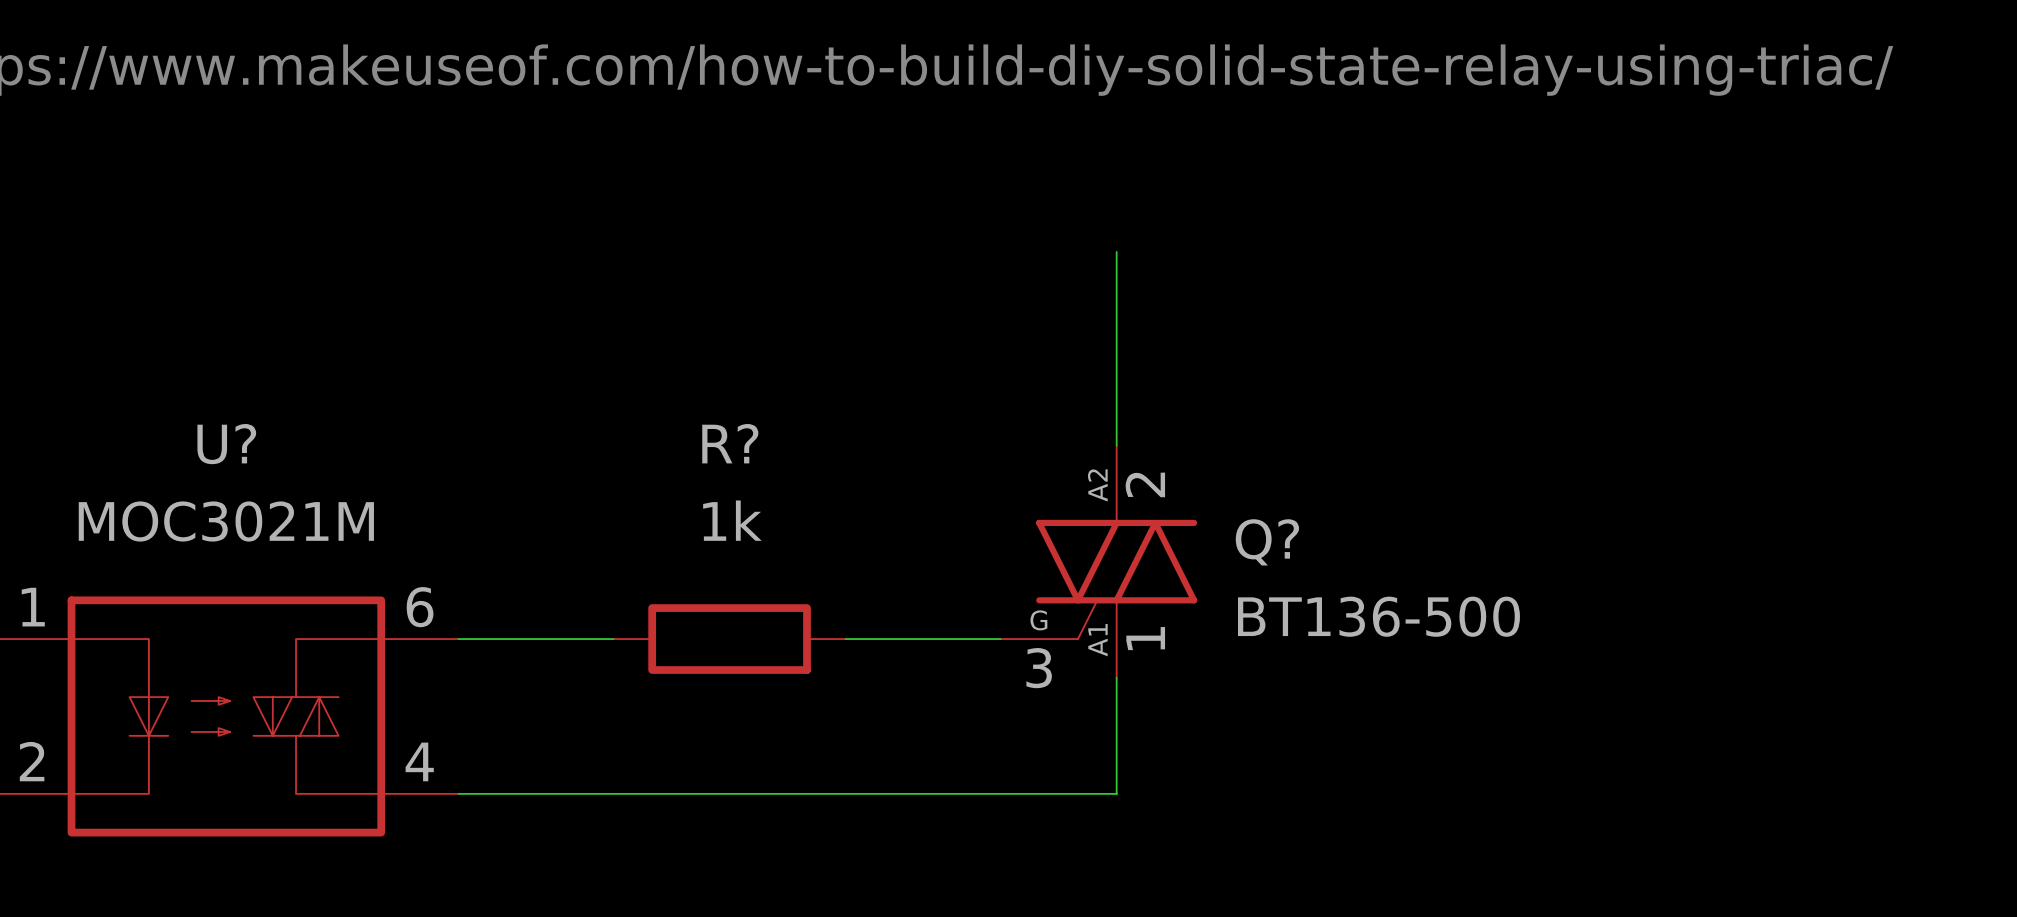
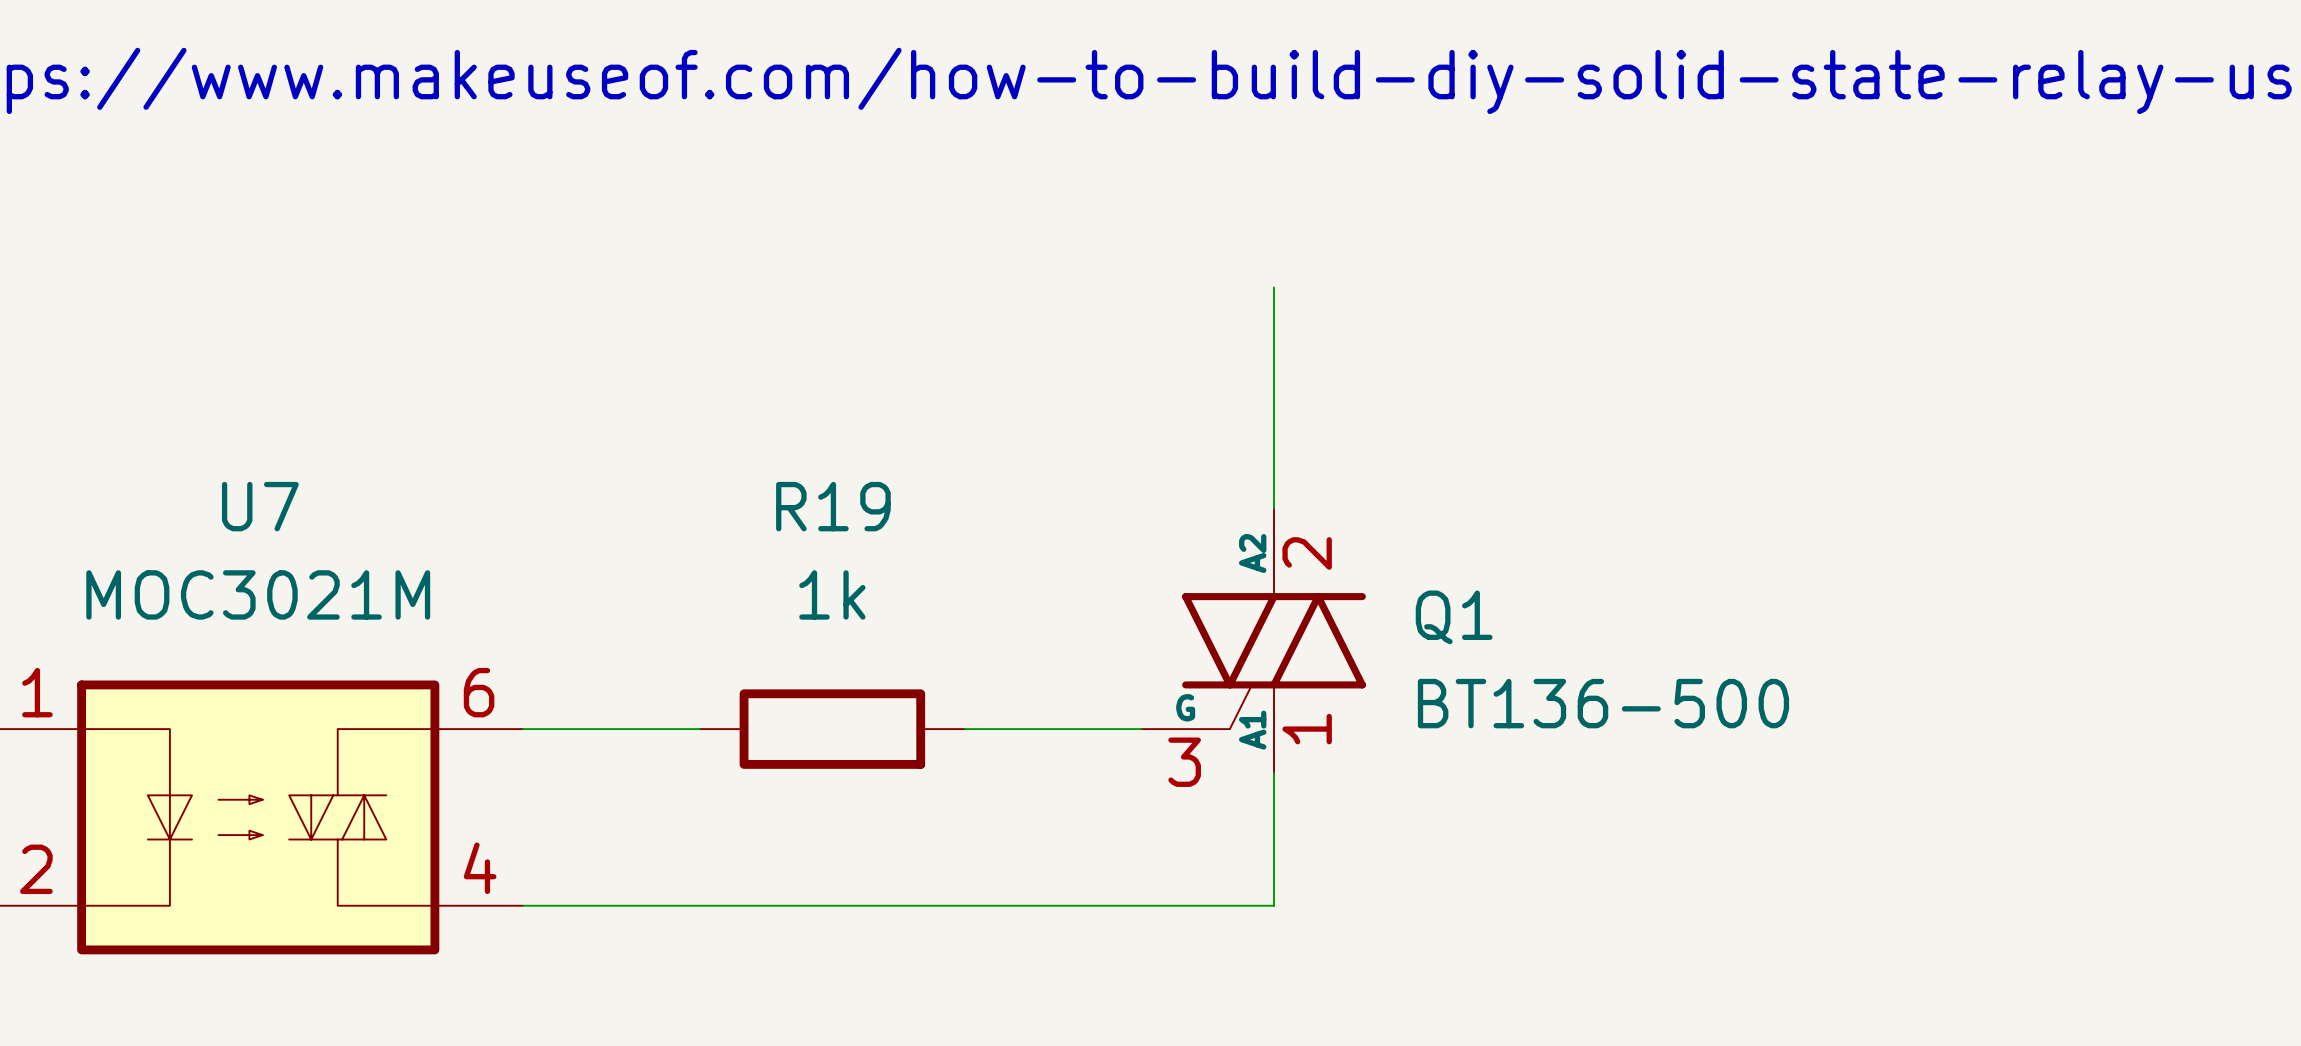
R? name: R? (730, 443) -> R19 (833, 506)
U? name: U? (226, 444) -> U7 (260, 506)
Q? name: Q? (1267, 542) -> Q1 (1454, 617)

